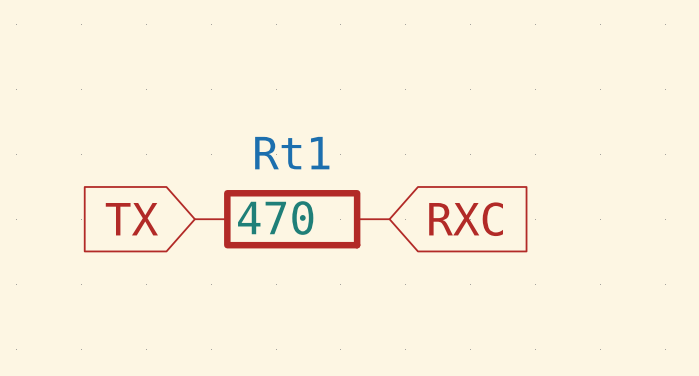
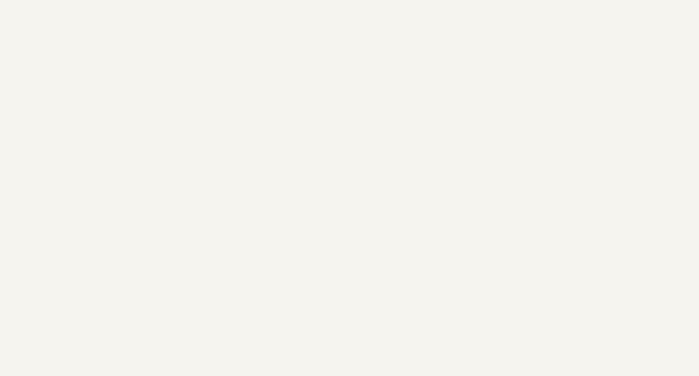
global label: TX (131, 219) -> none
Rt1: 470 (292, 219) -> none
global label: RXC (466, 219) -> none

